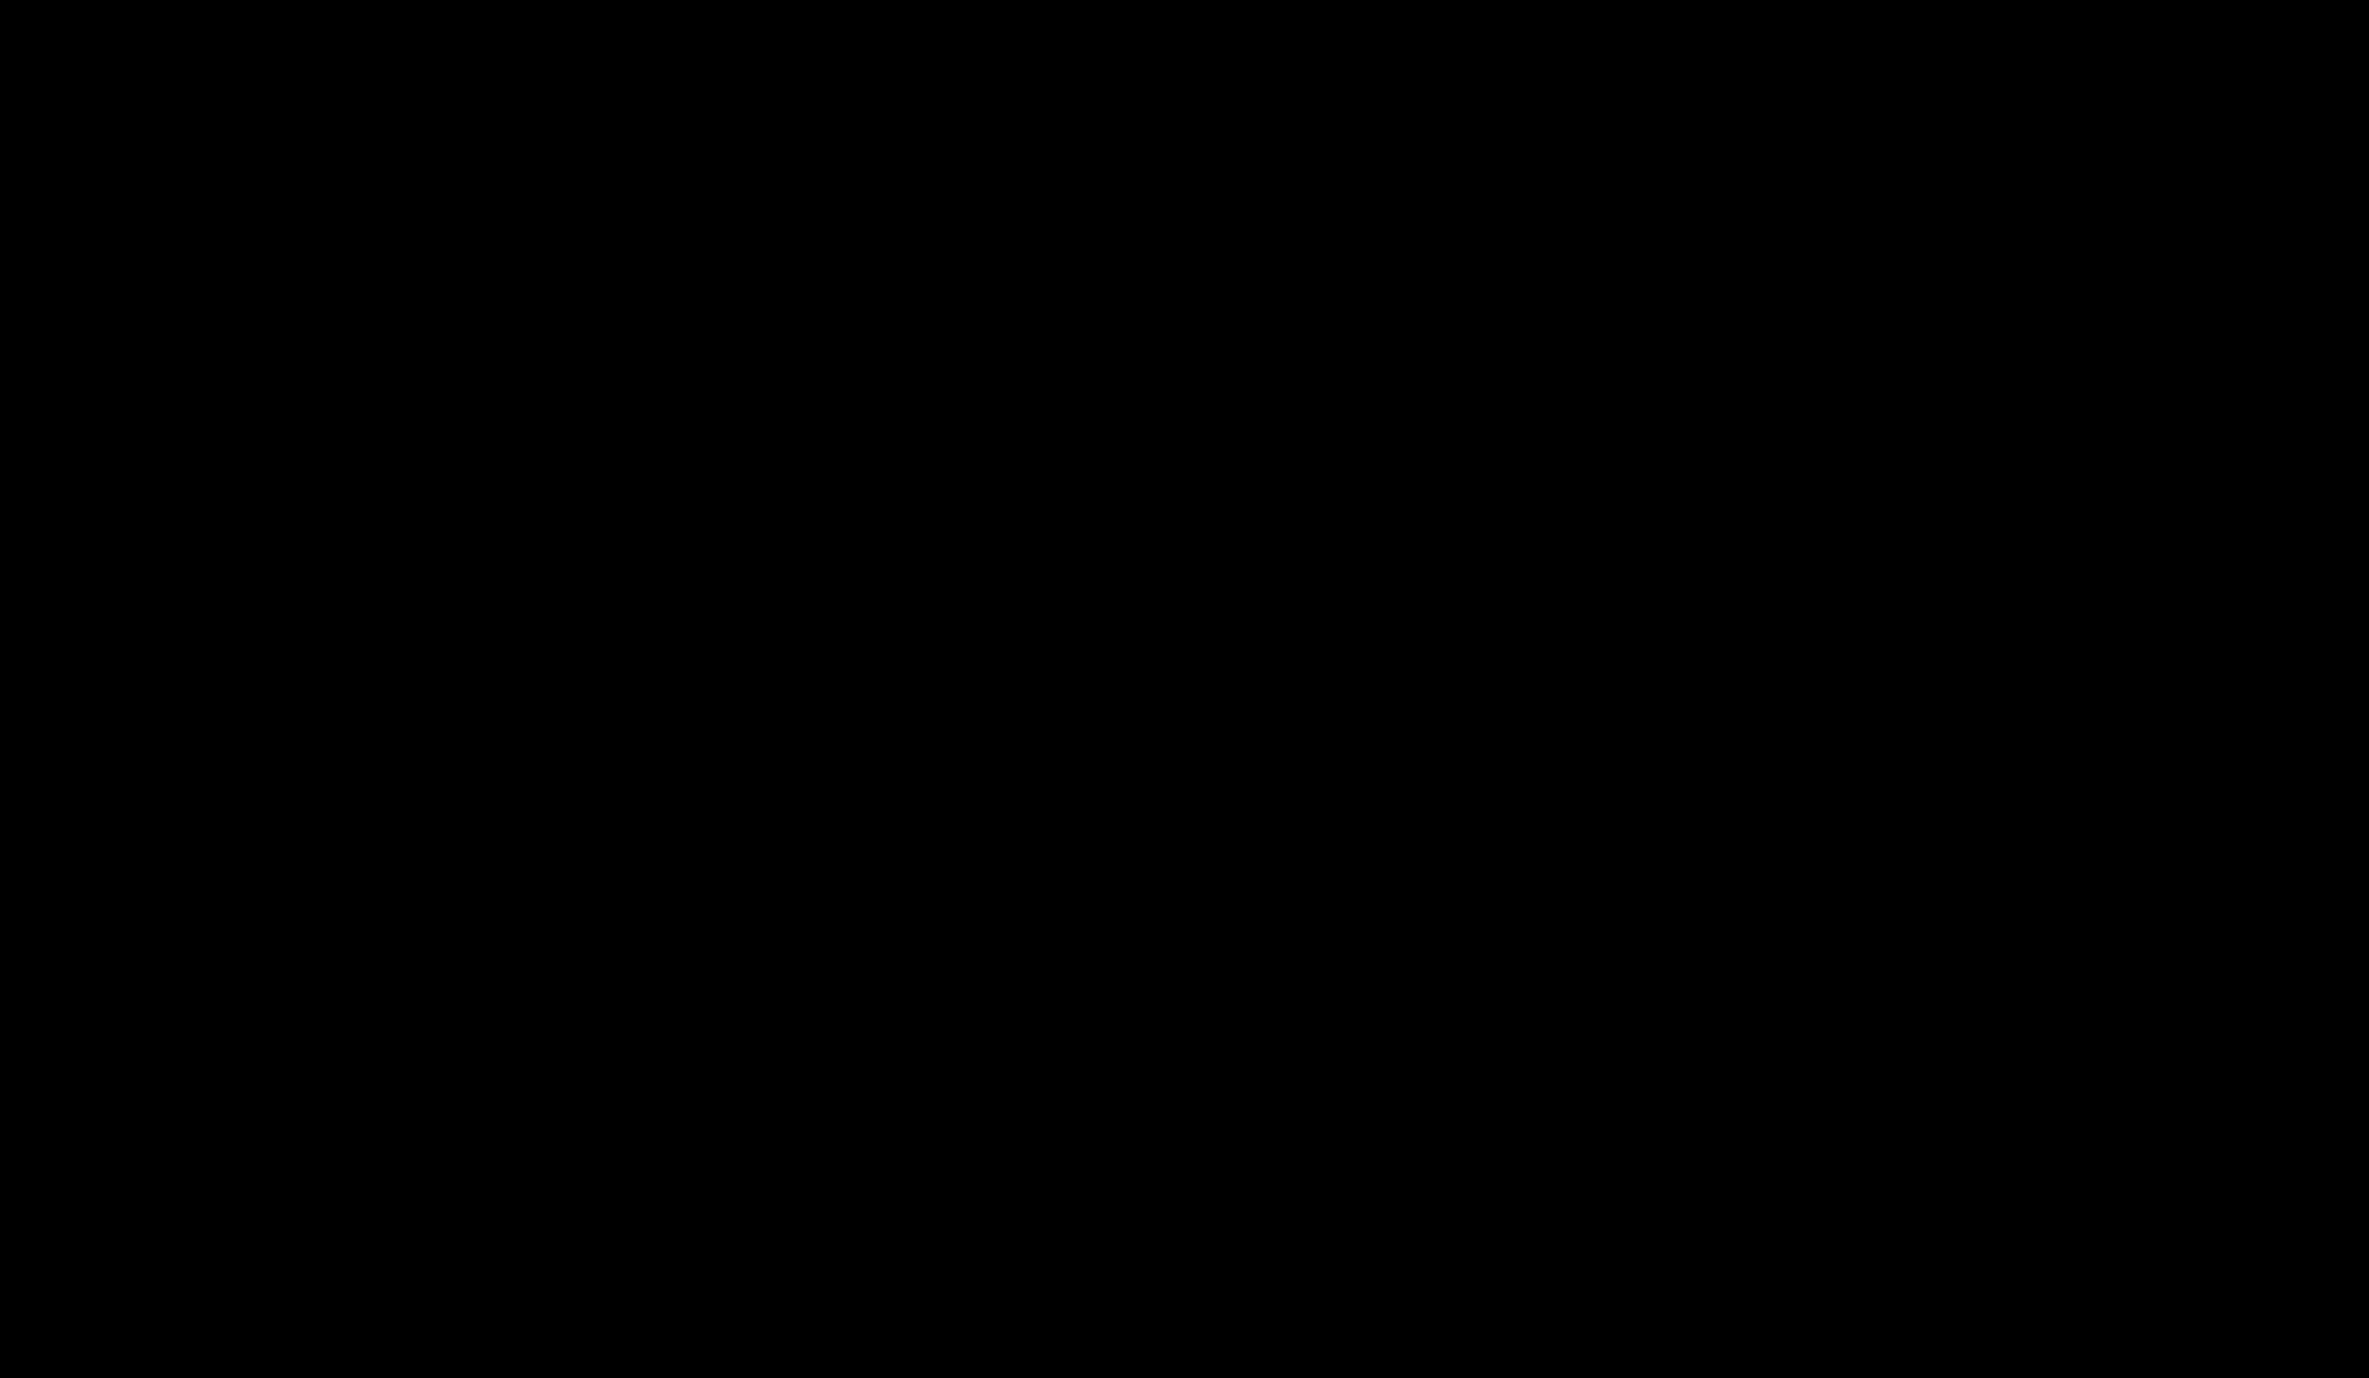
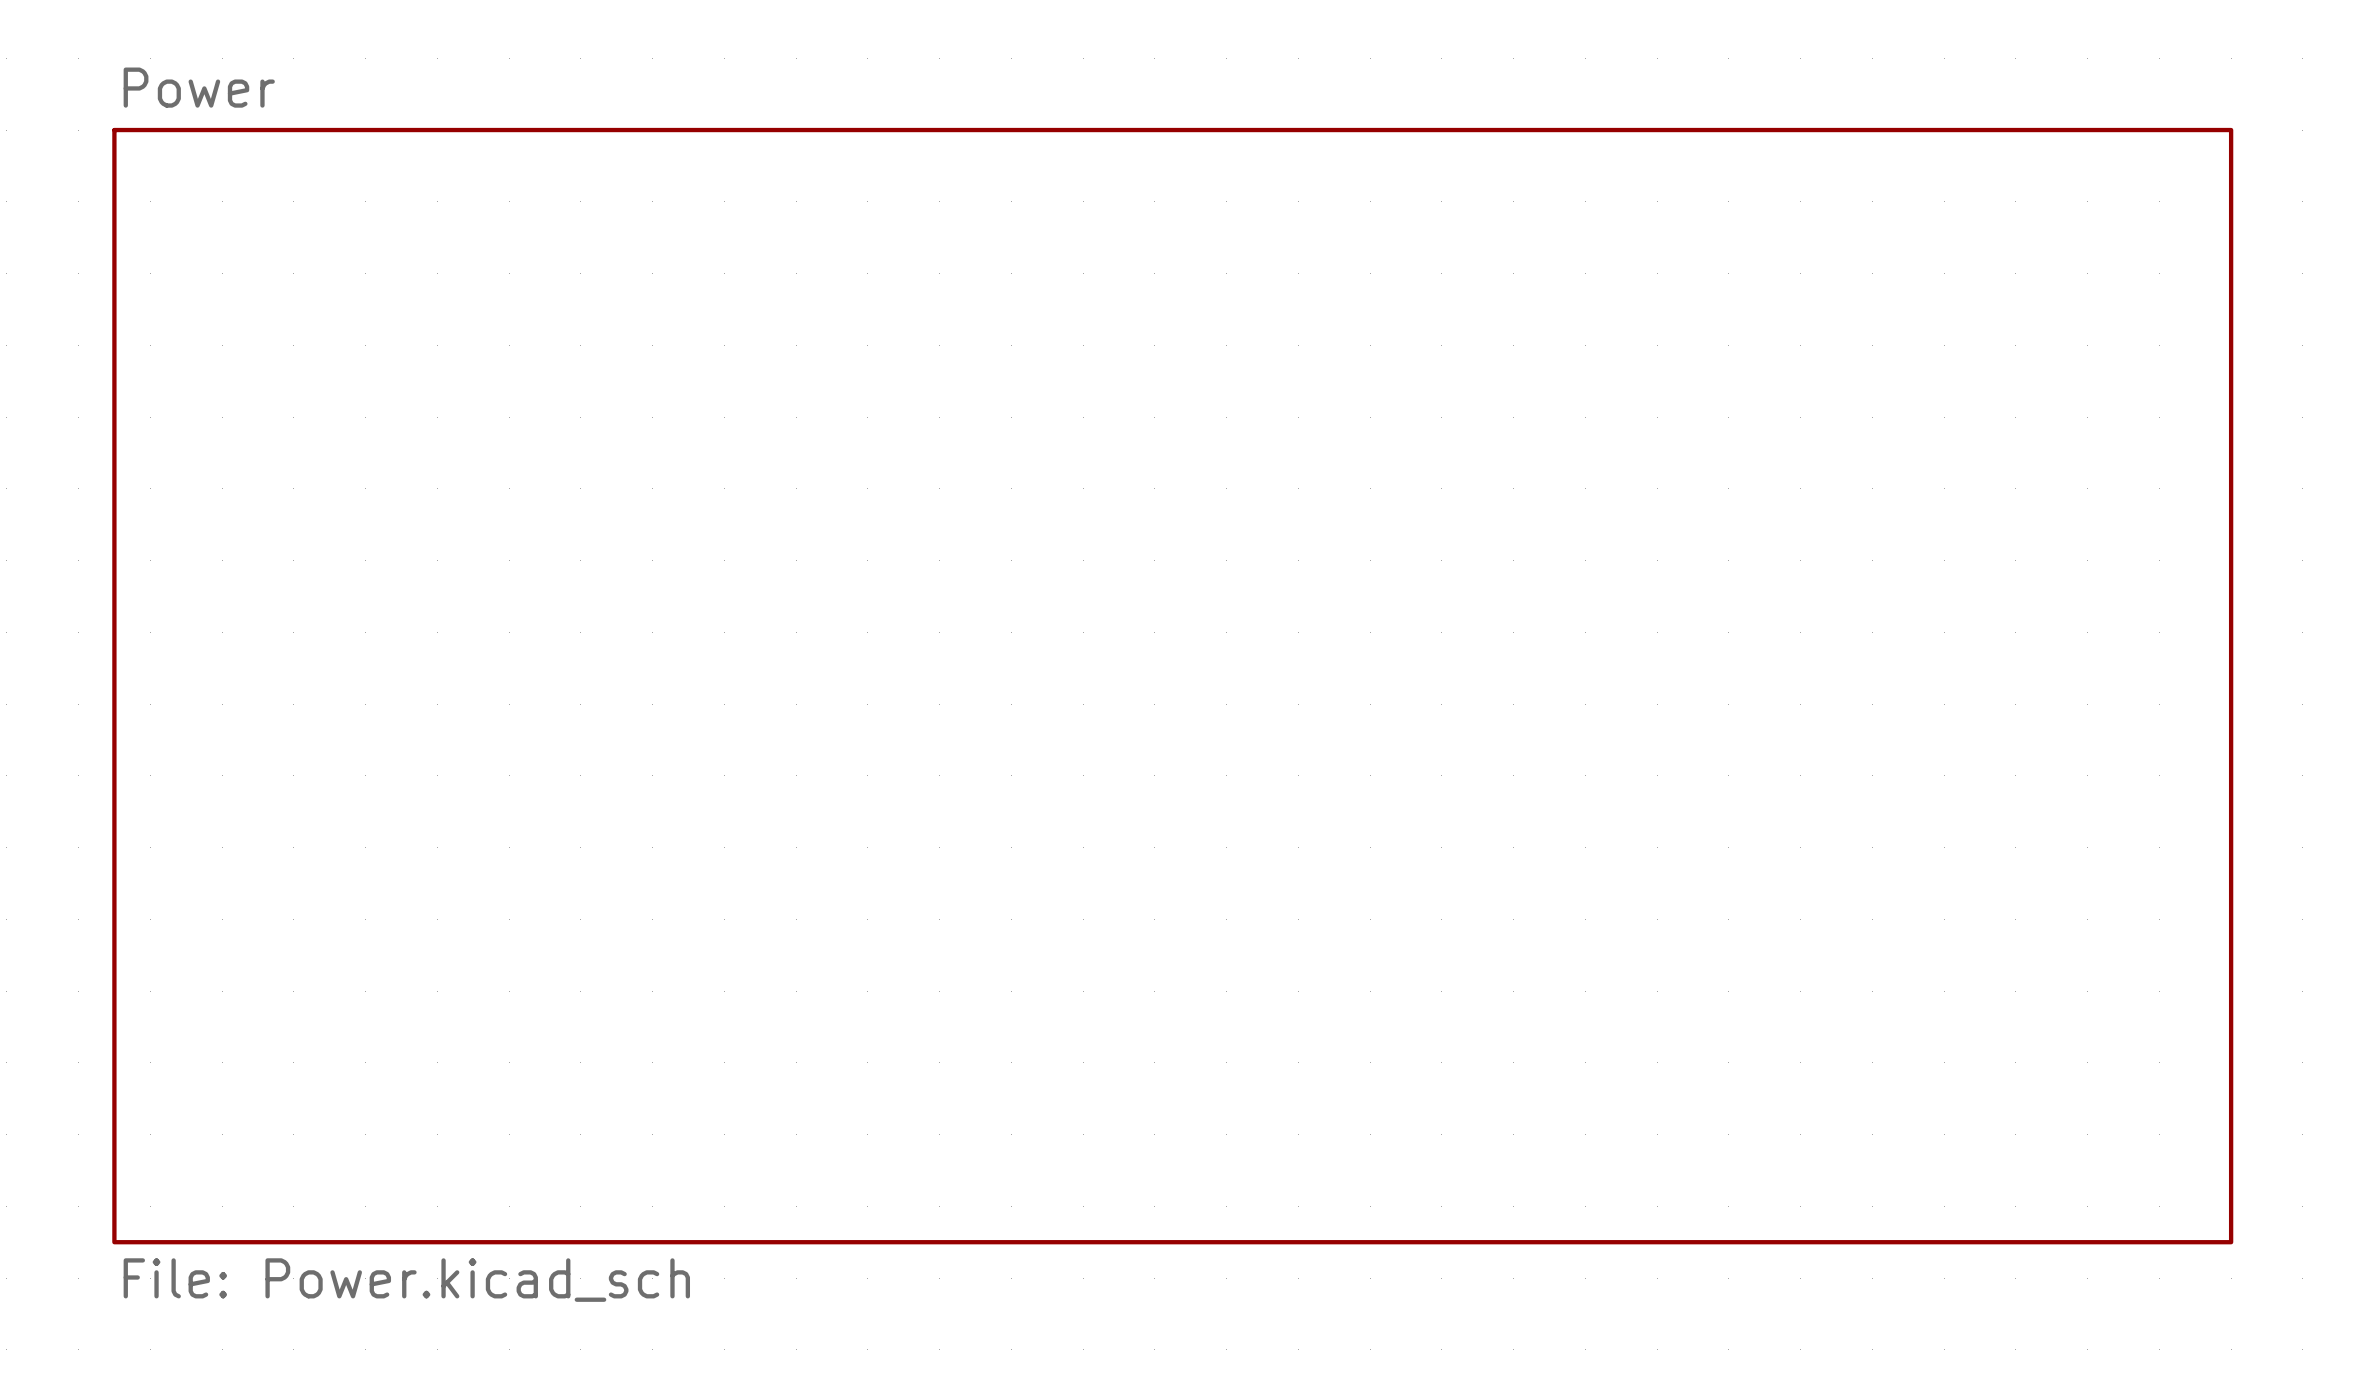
sheet Power: none -> File: Power.kicad_sch (1172, 686)

